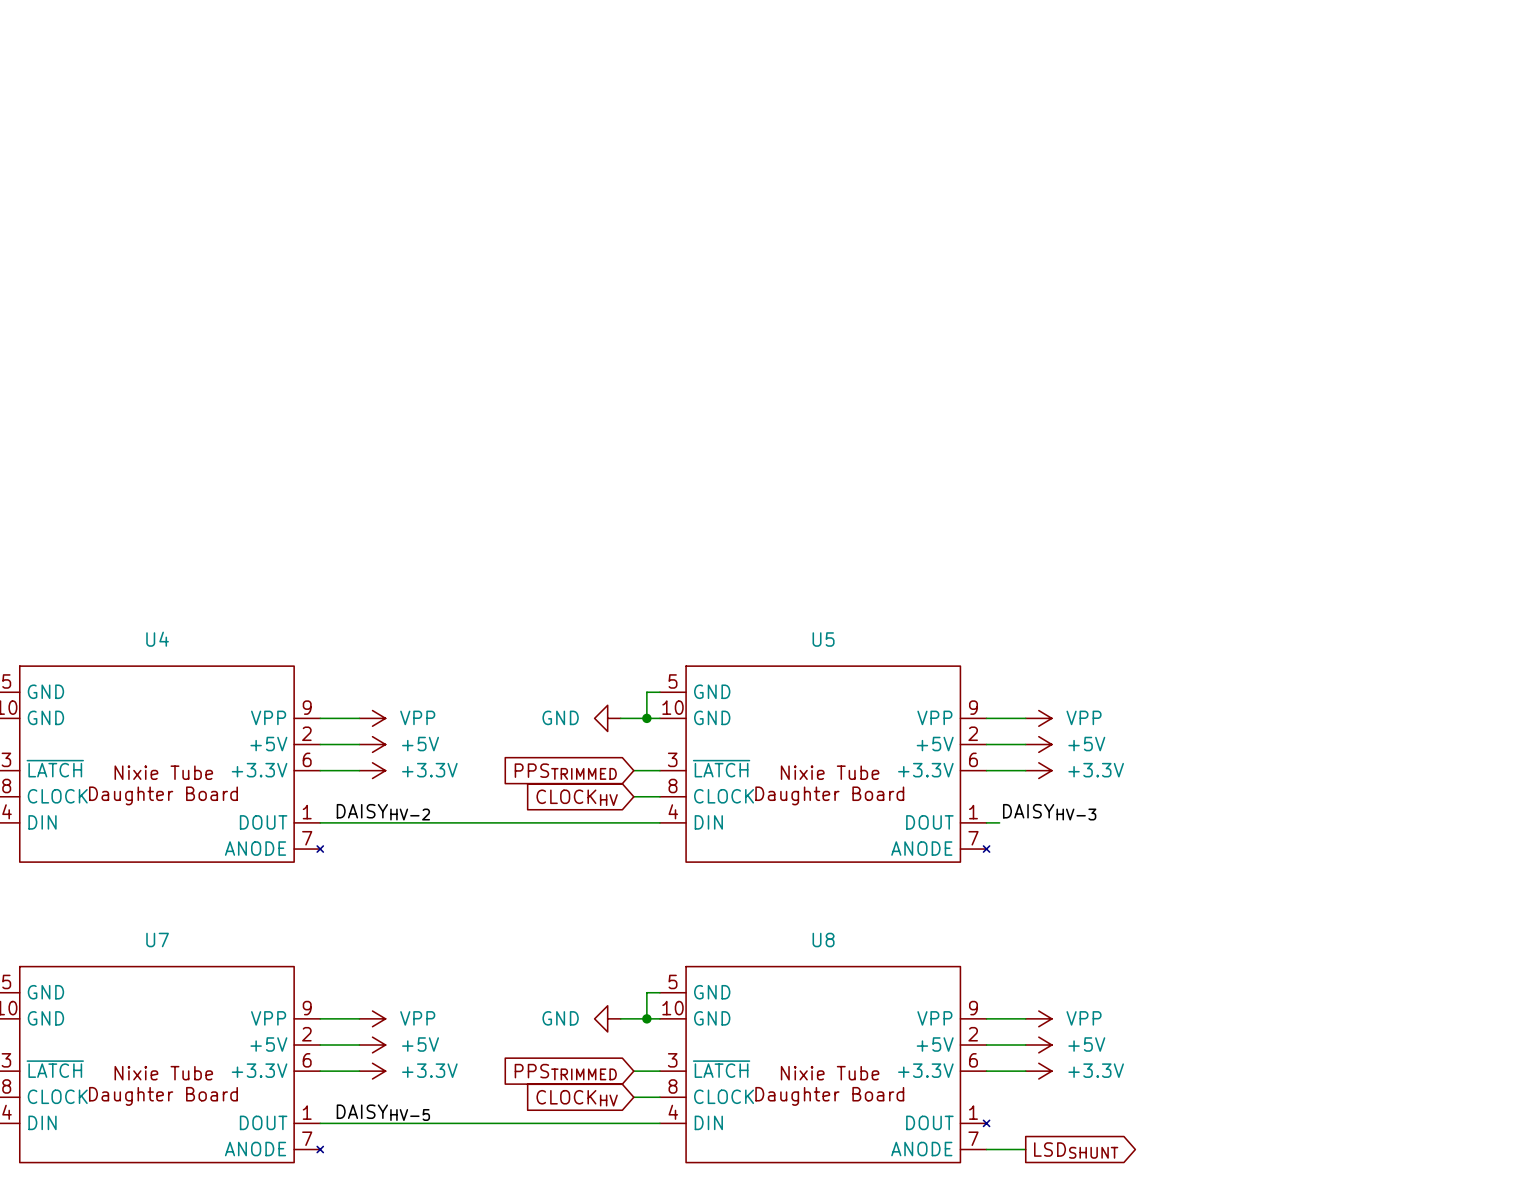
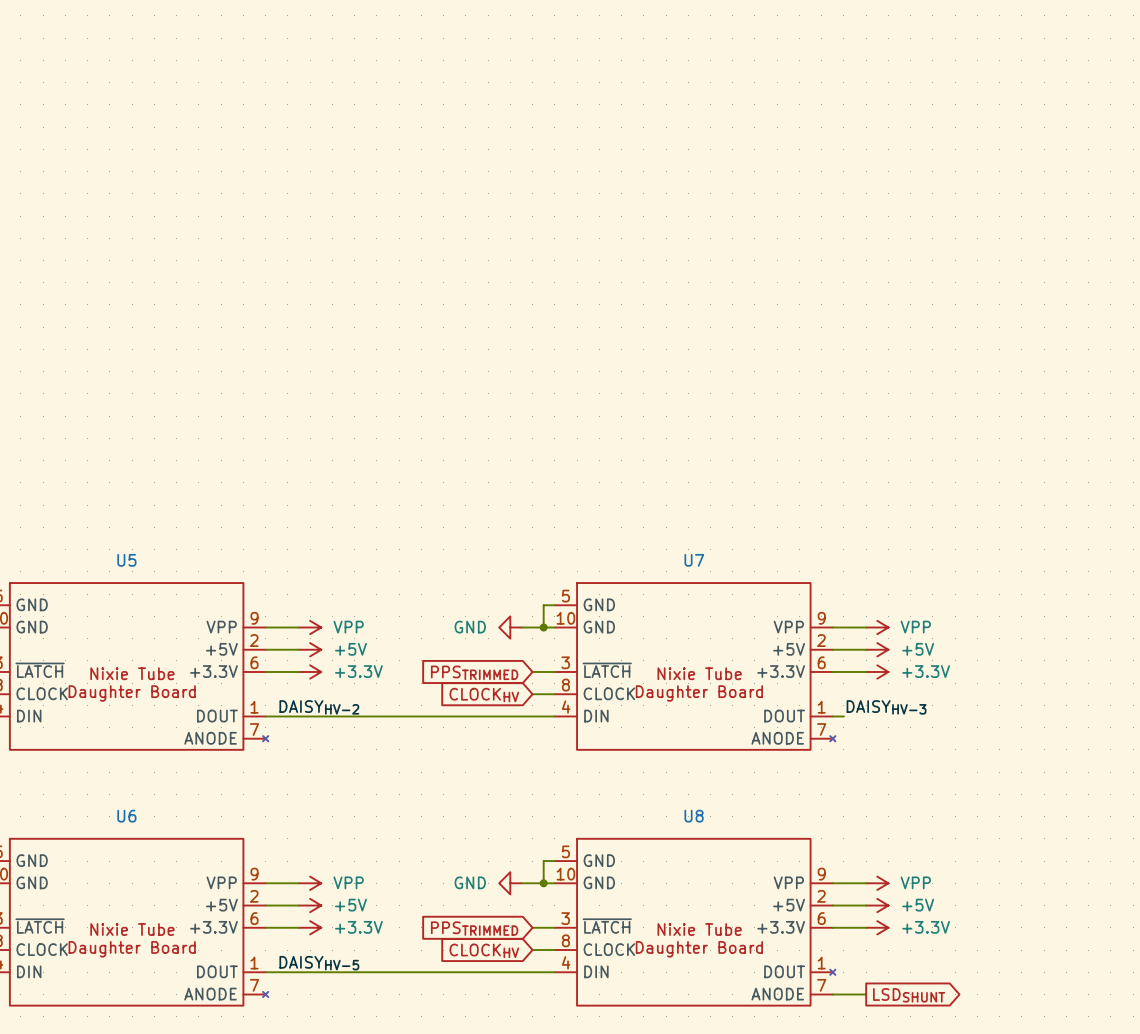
U4 name: U4 (157, 639) -> U5 (126, 560)
U5 name: U5 (823, 639) -> U7 (694, 560)
U7 name: U7 (157, 939) -> U6 (126, 816)

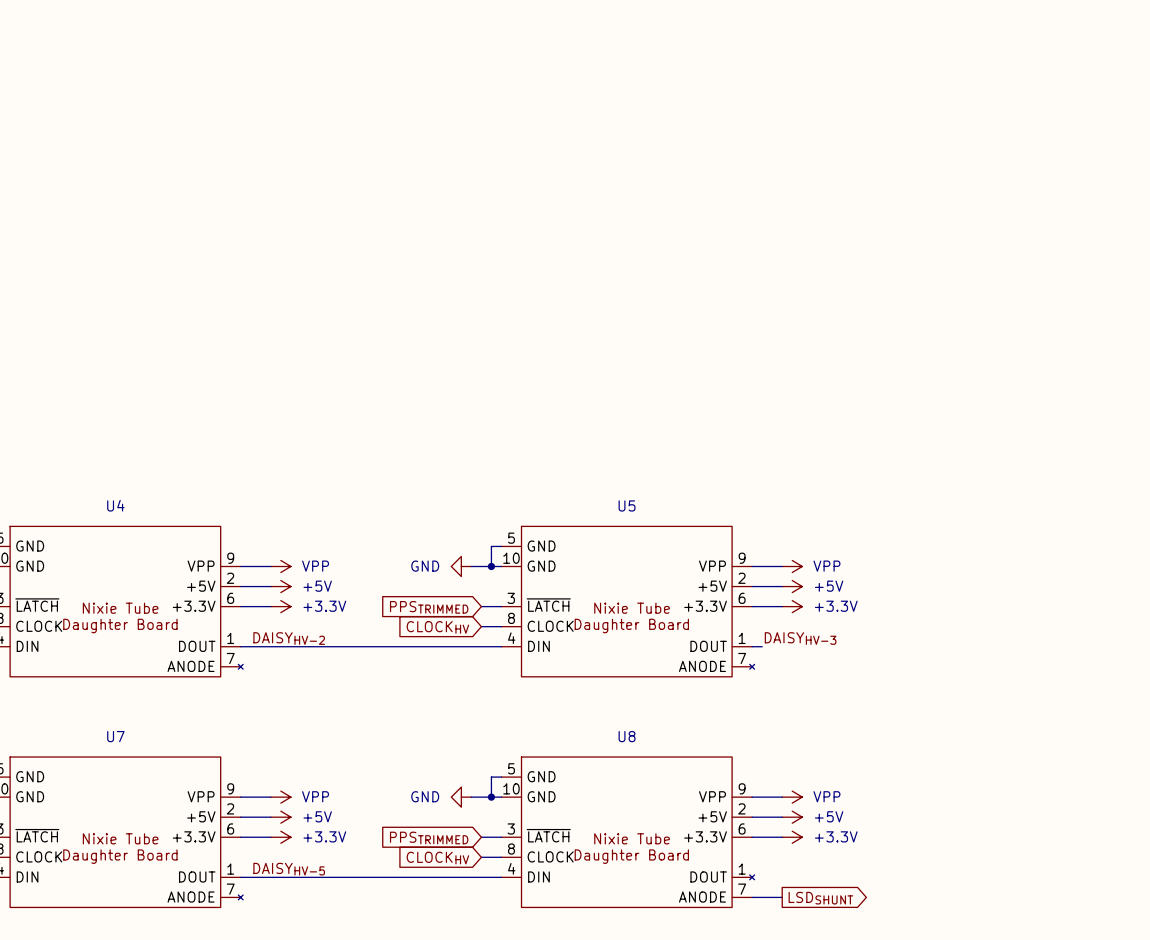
U5 name: U5 (126, 560) -> U4 (115, 505)
U7 name: U7 (694, 560) -> U5 (627, 505)
U6 name: U6 (126, 816) -> U7 (115, 736)

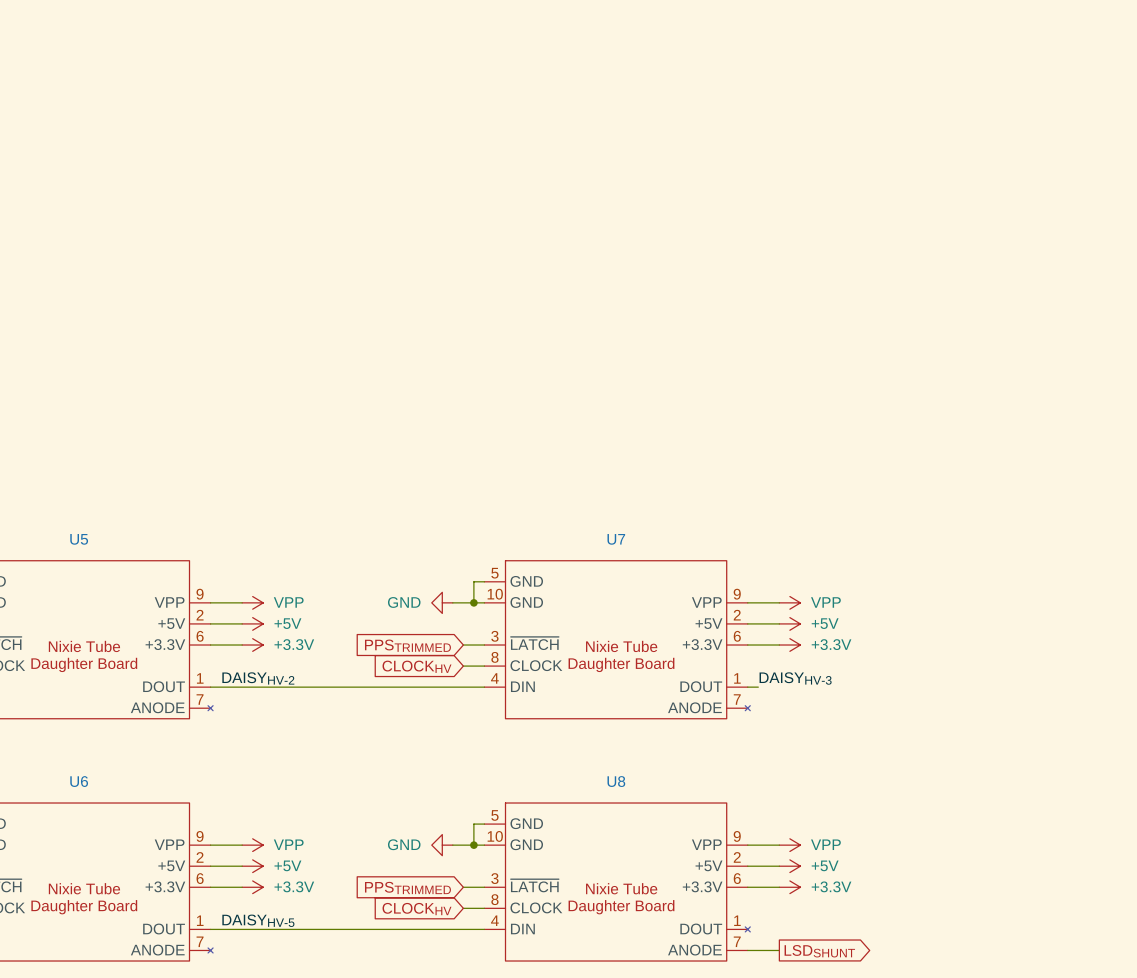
U4 name: U4 (115, 505) -> U5 (79, 539)
U5 name: U5 (627, 505) -> U7 (616, 539)
U7 name: U7 (115, 736) -> U6 (79, 781)

